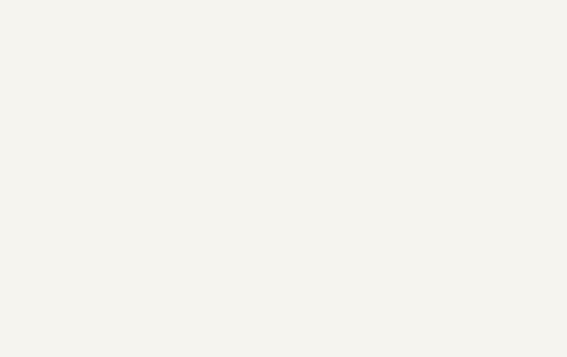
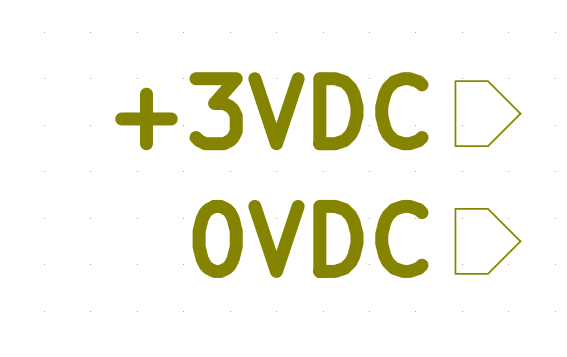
hierarchical label: none -> +3VDC (271, 111)
hierarchical label: none -> 0VDC (310, 238)

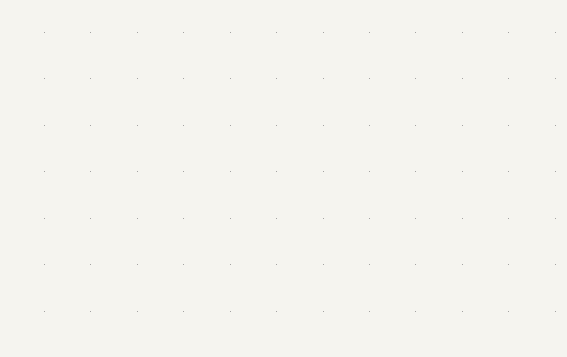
hierarchical label: +3VDC (271, 111) -> none
hierarchical label: 0VDC (310, 238) -> none

